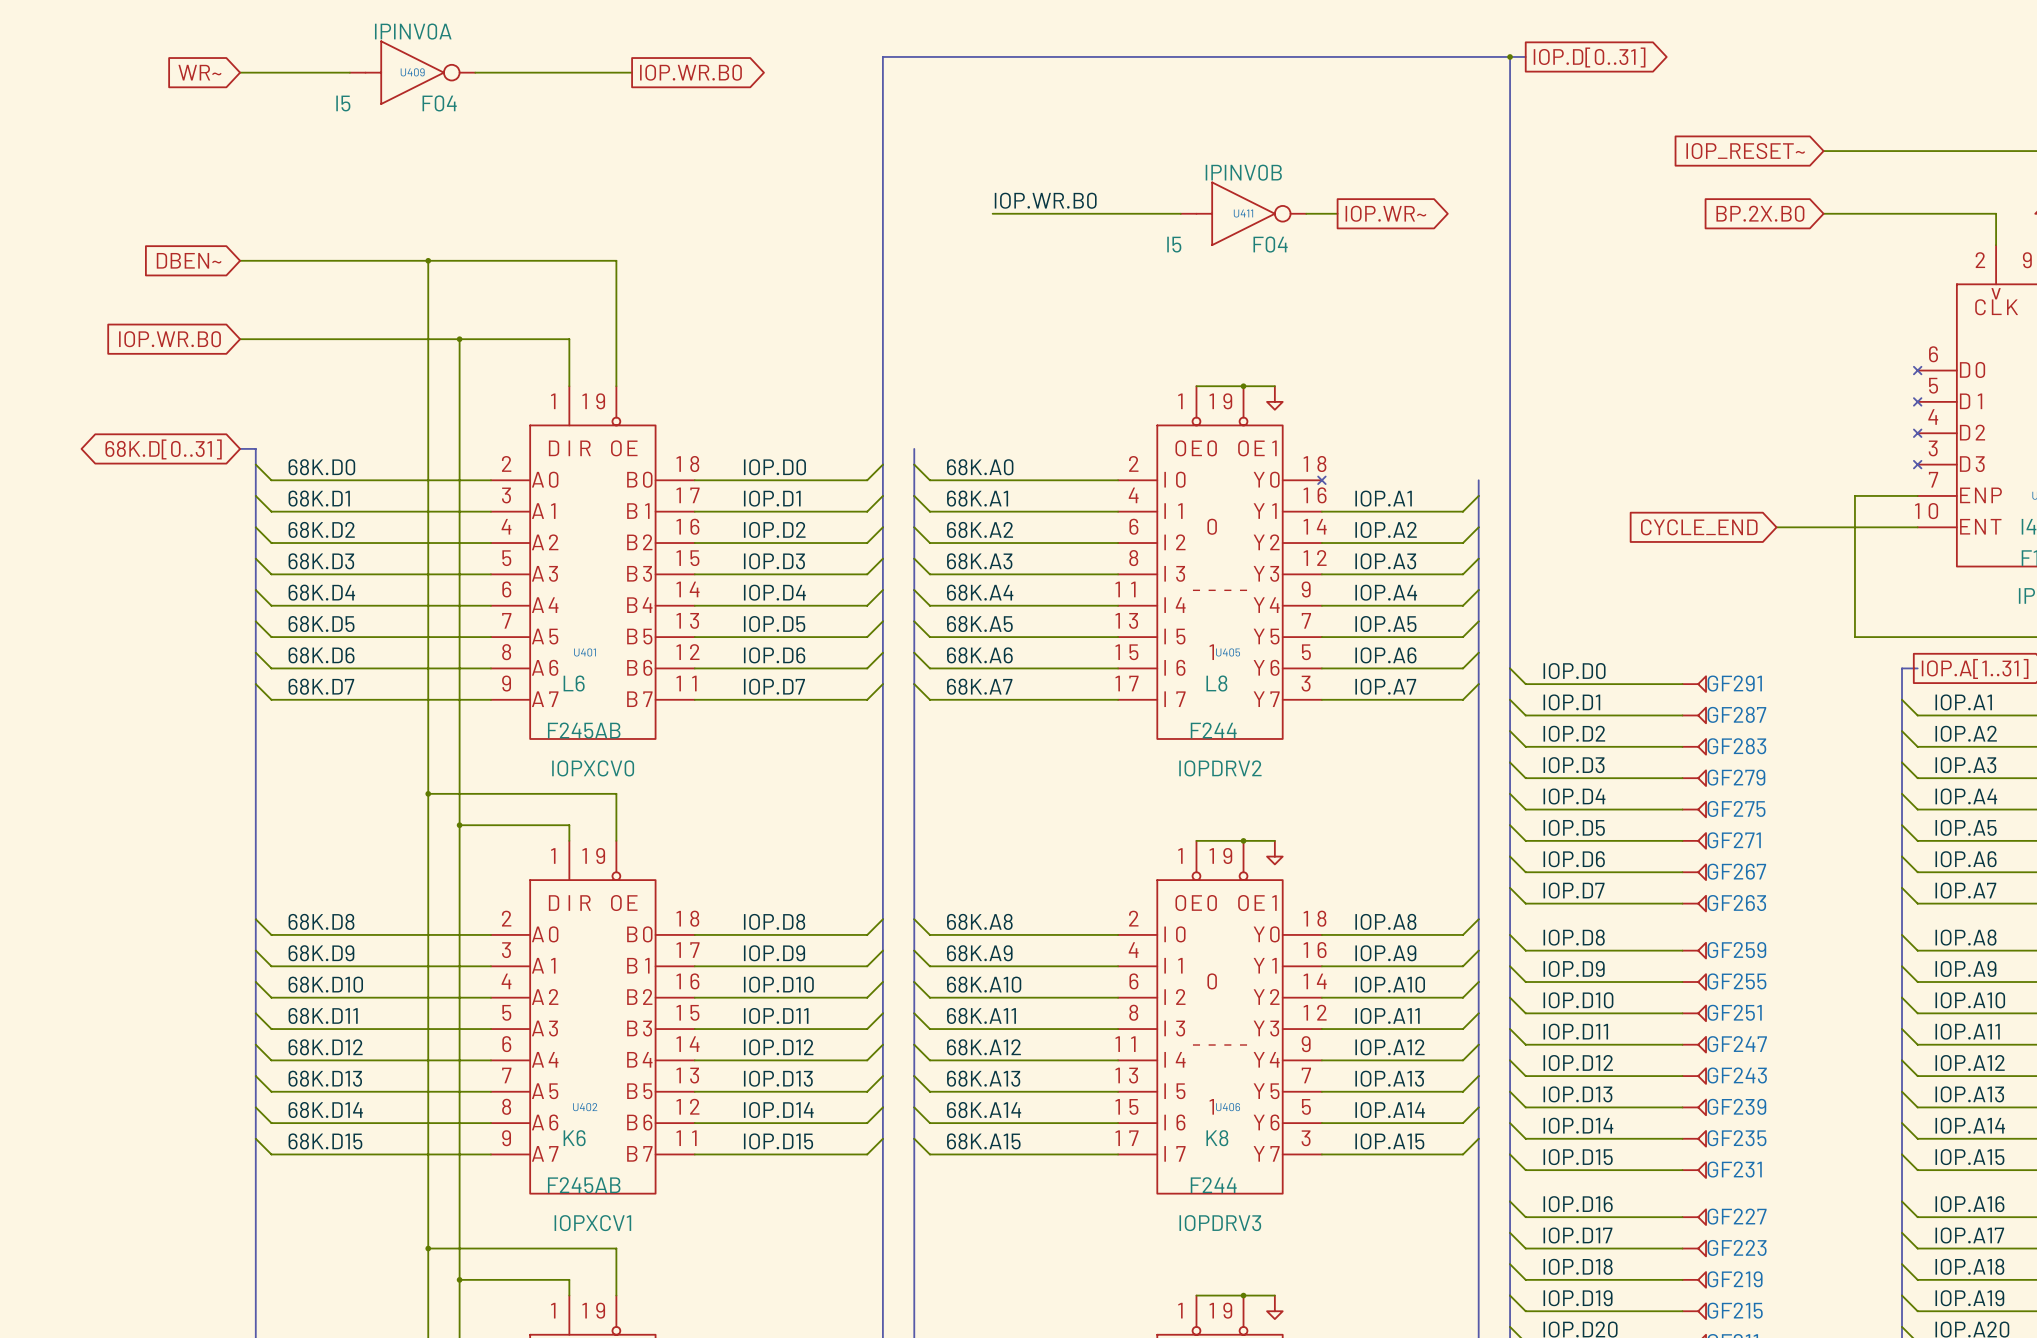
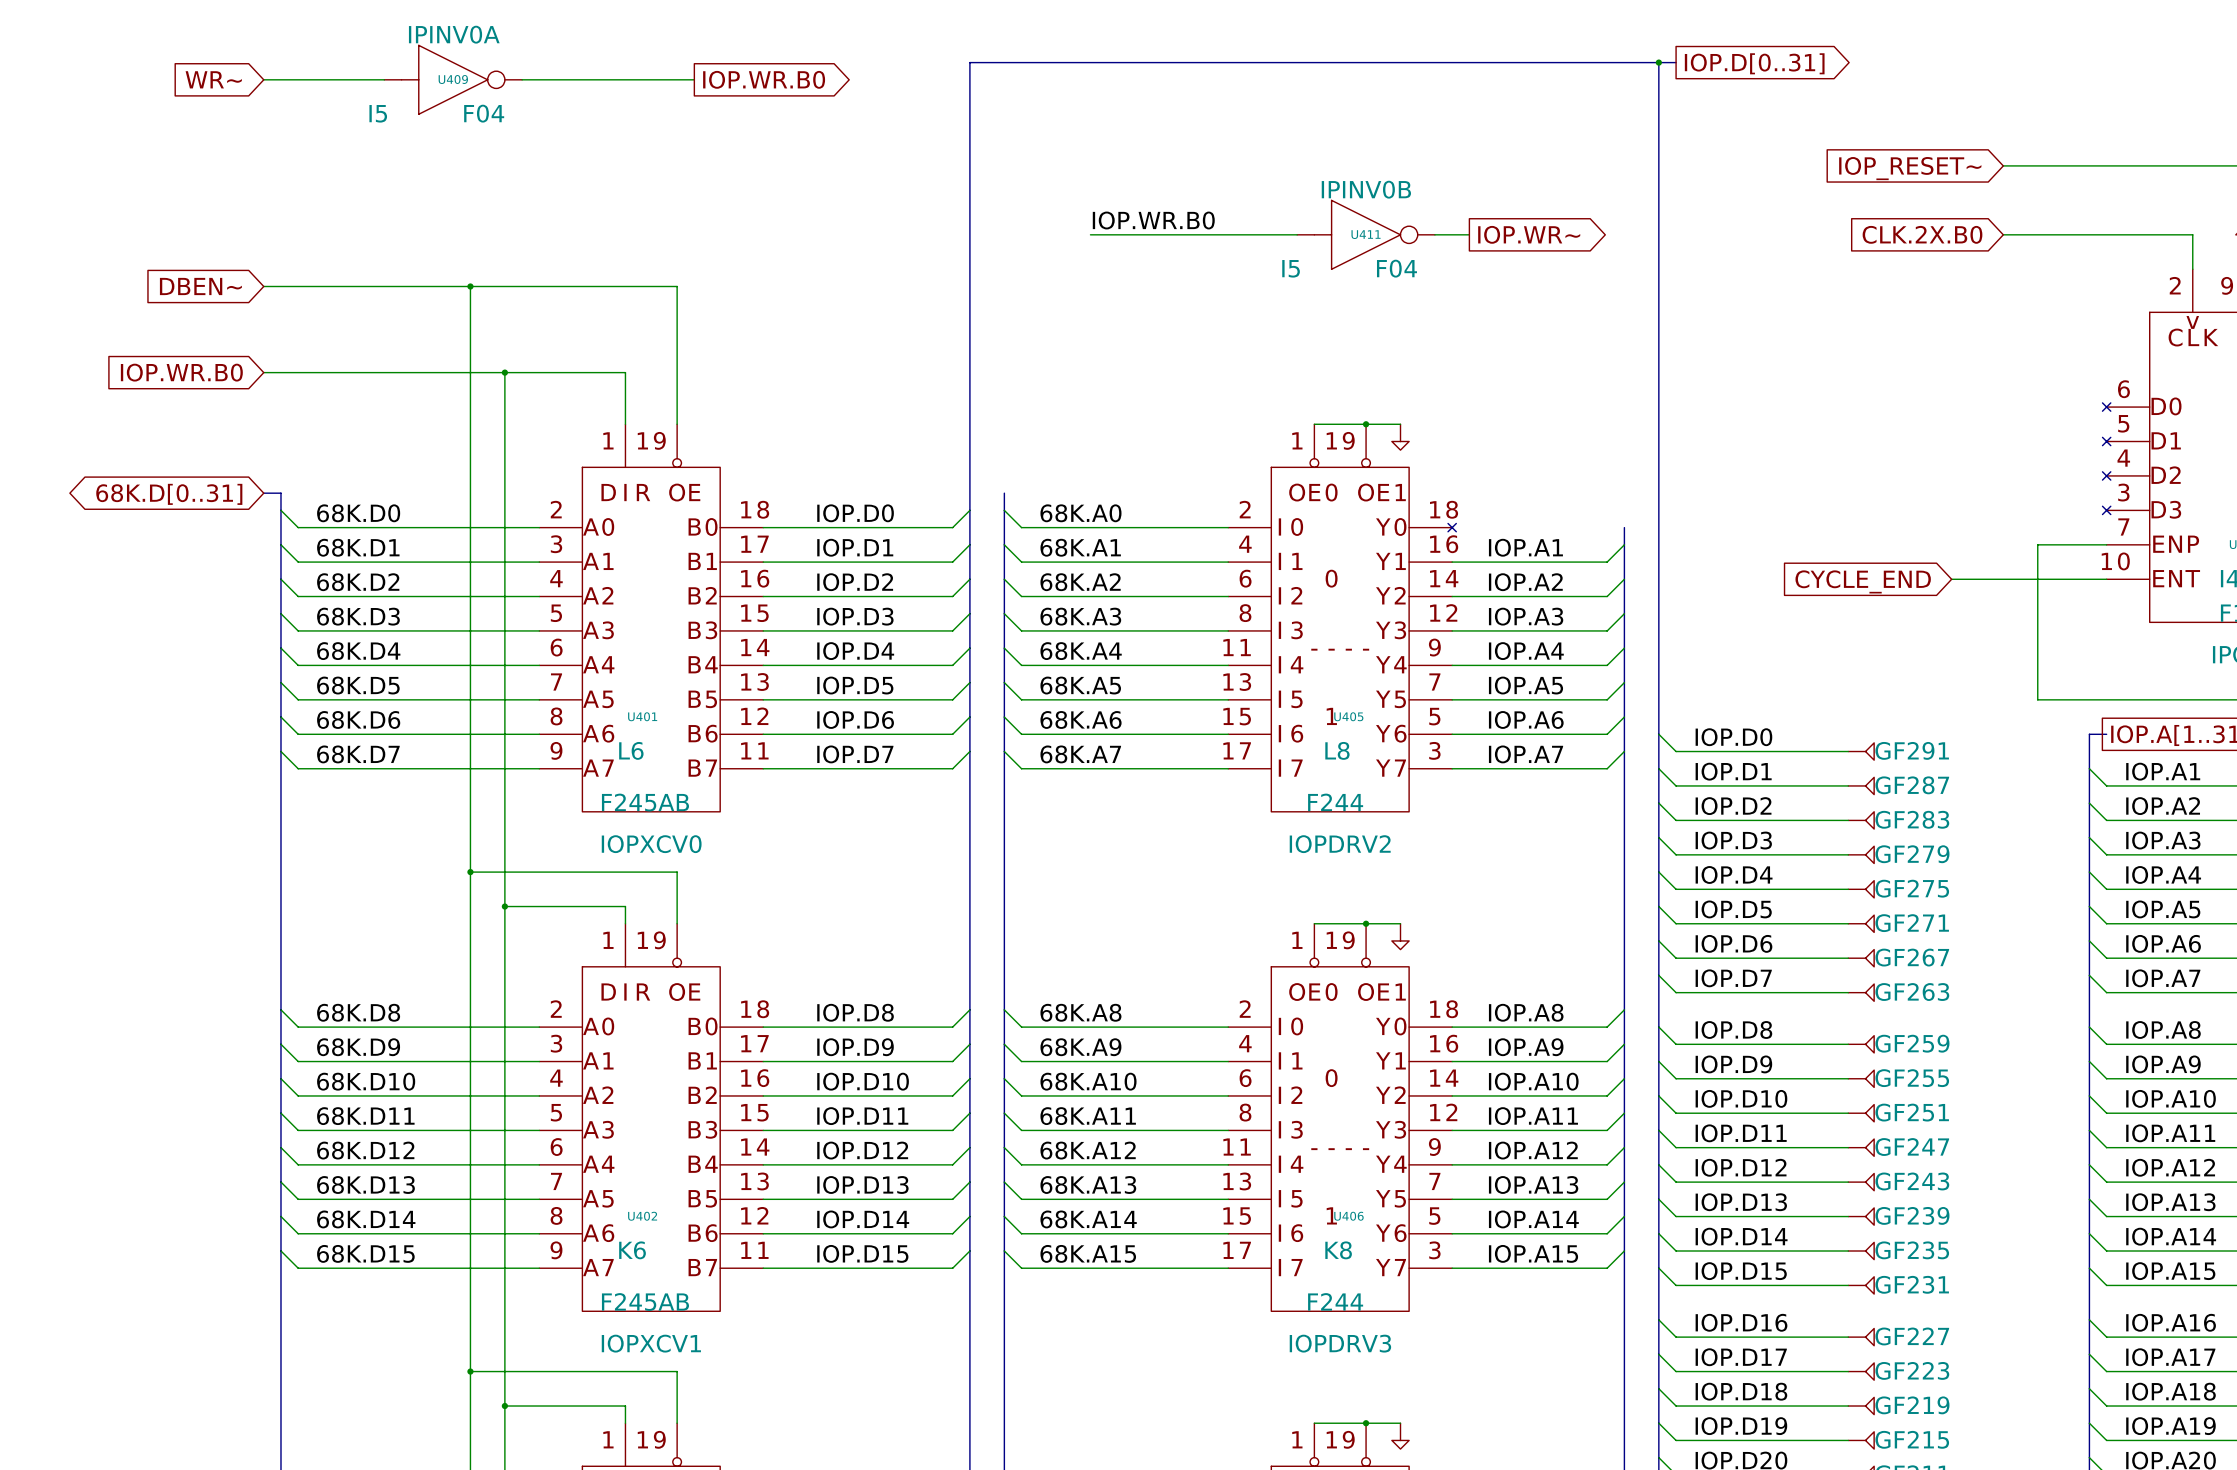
global label: BP.2X.B0 (1760, 213) -> CLK.2X.B0 (1922, 234)

